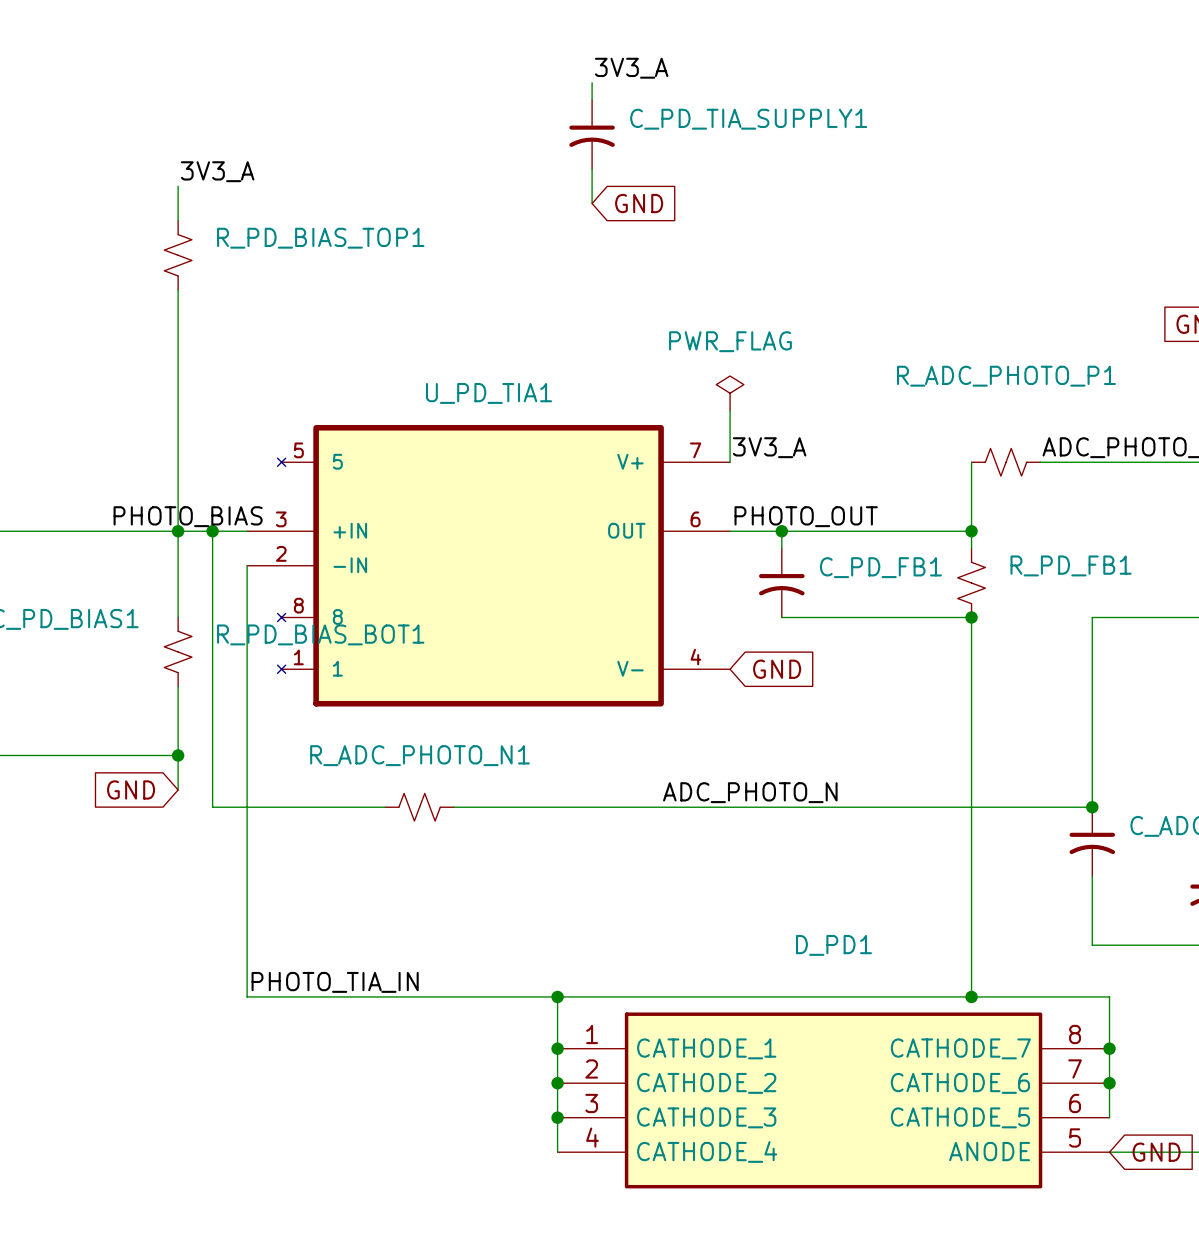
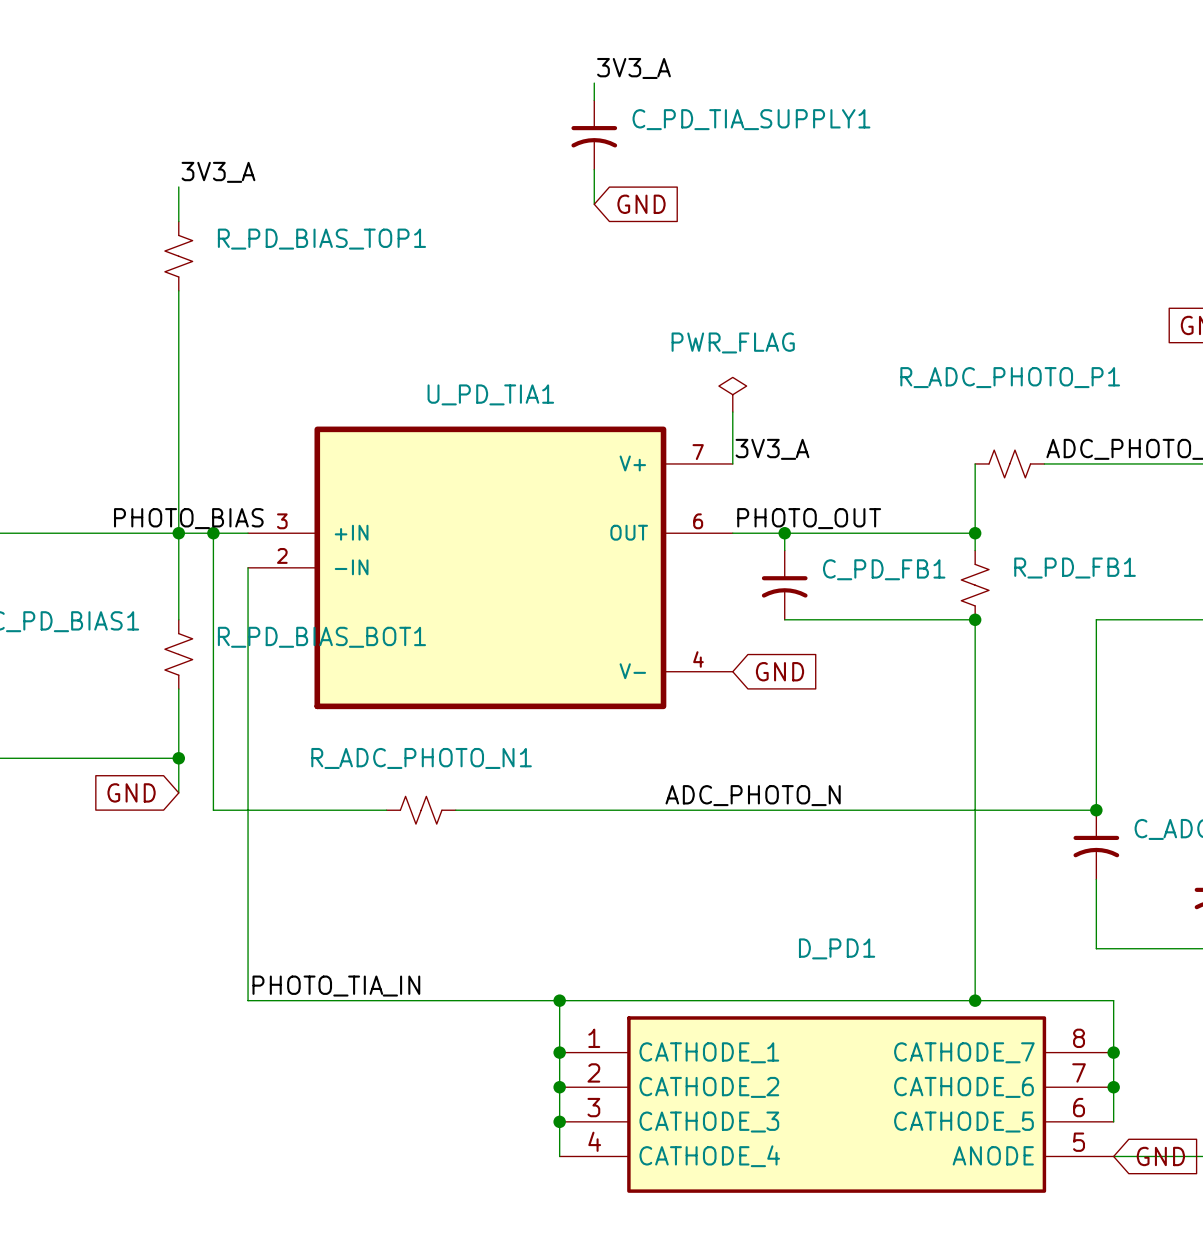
U_PD_TIA1 symbol: [247, 424, 731, 707] -> [248, 426, 733, 710]

